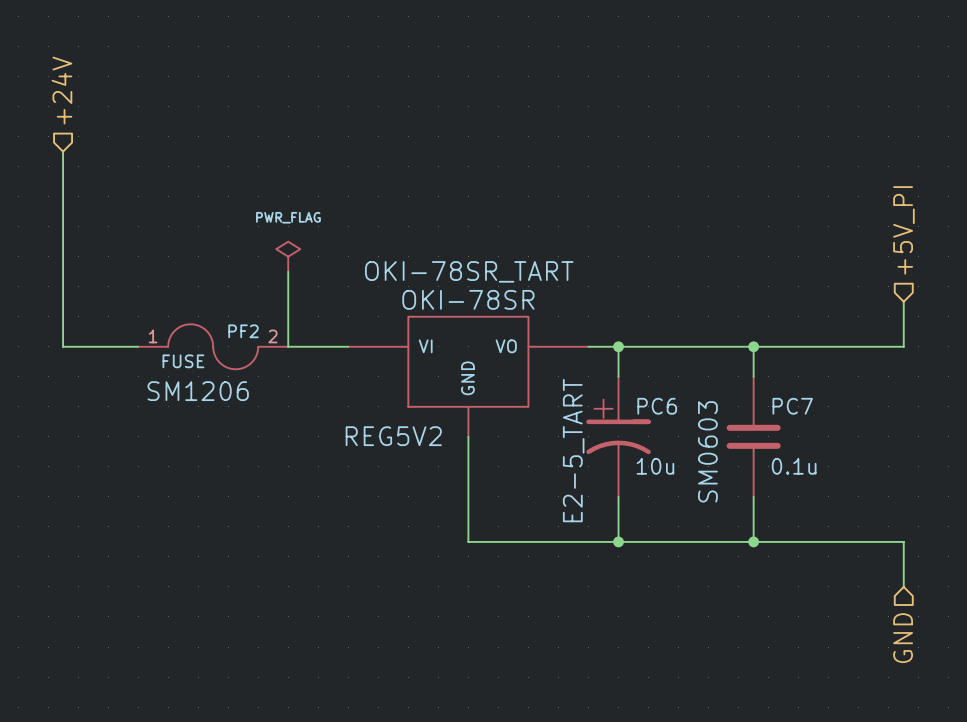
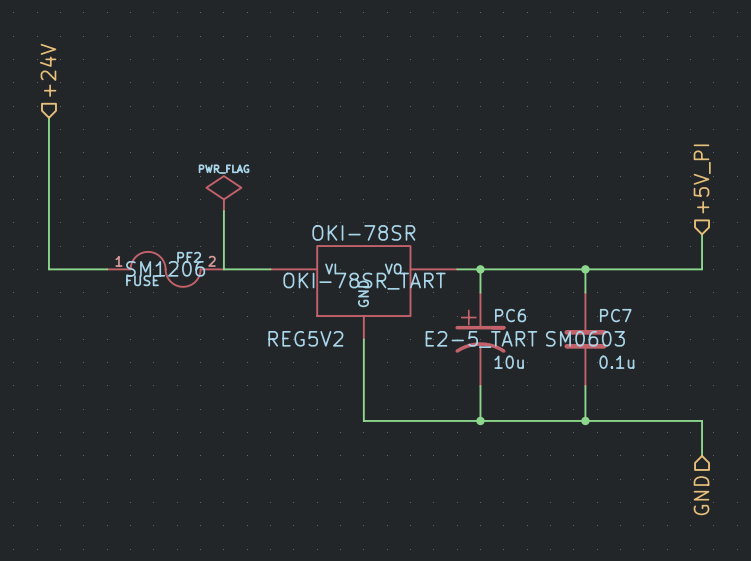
power symbol shape: [276, 241, 301, 272] -> [206, 176, 242, 212]
REG5V2 text position: OKI-78SR_TART (469, 271) -> OKI-78SR_TART (364, 281)
PF2 text position: SM1206 (198, 391) -> SM1206 (165, 268)
PC6 text rotation: 0° (573, 450) -> 90° clockwise (481, 339)
PC7 text rotation: 0° (707, 451) -> 90° clockwise (585, 338)

